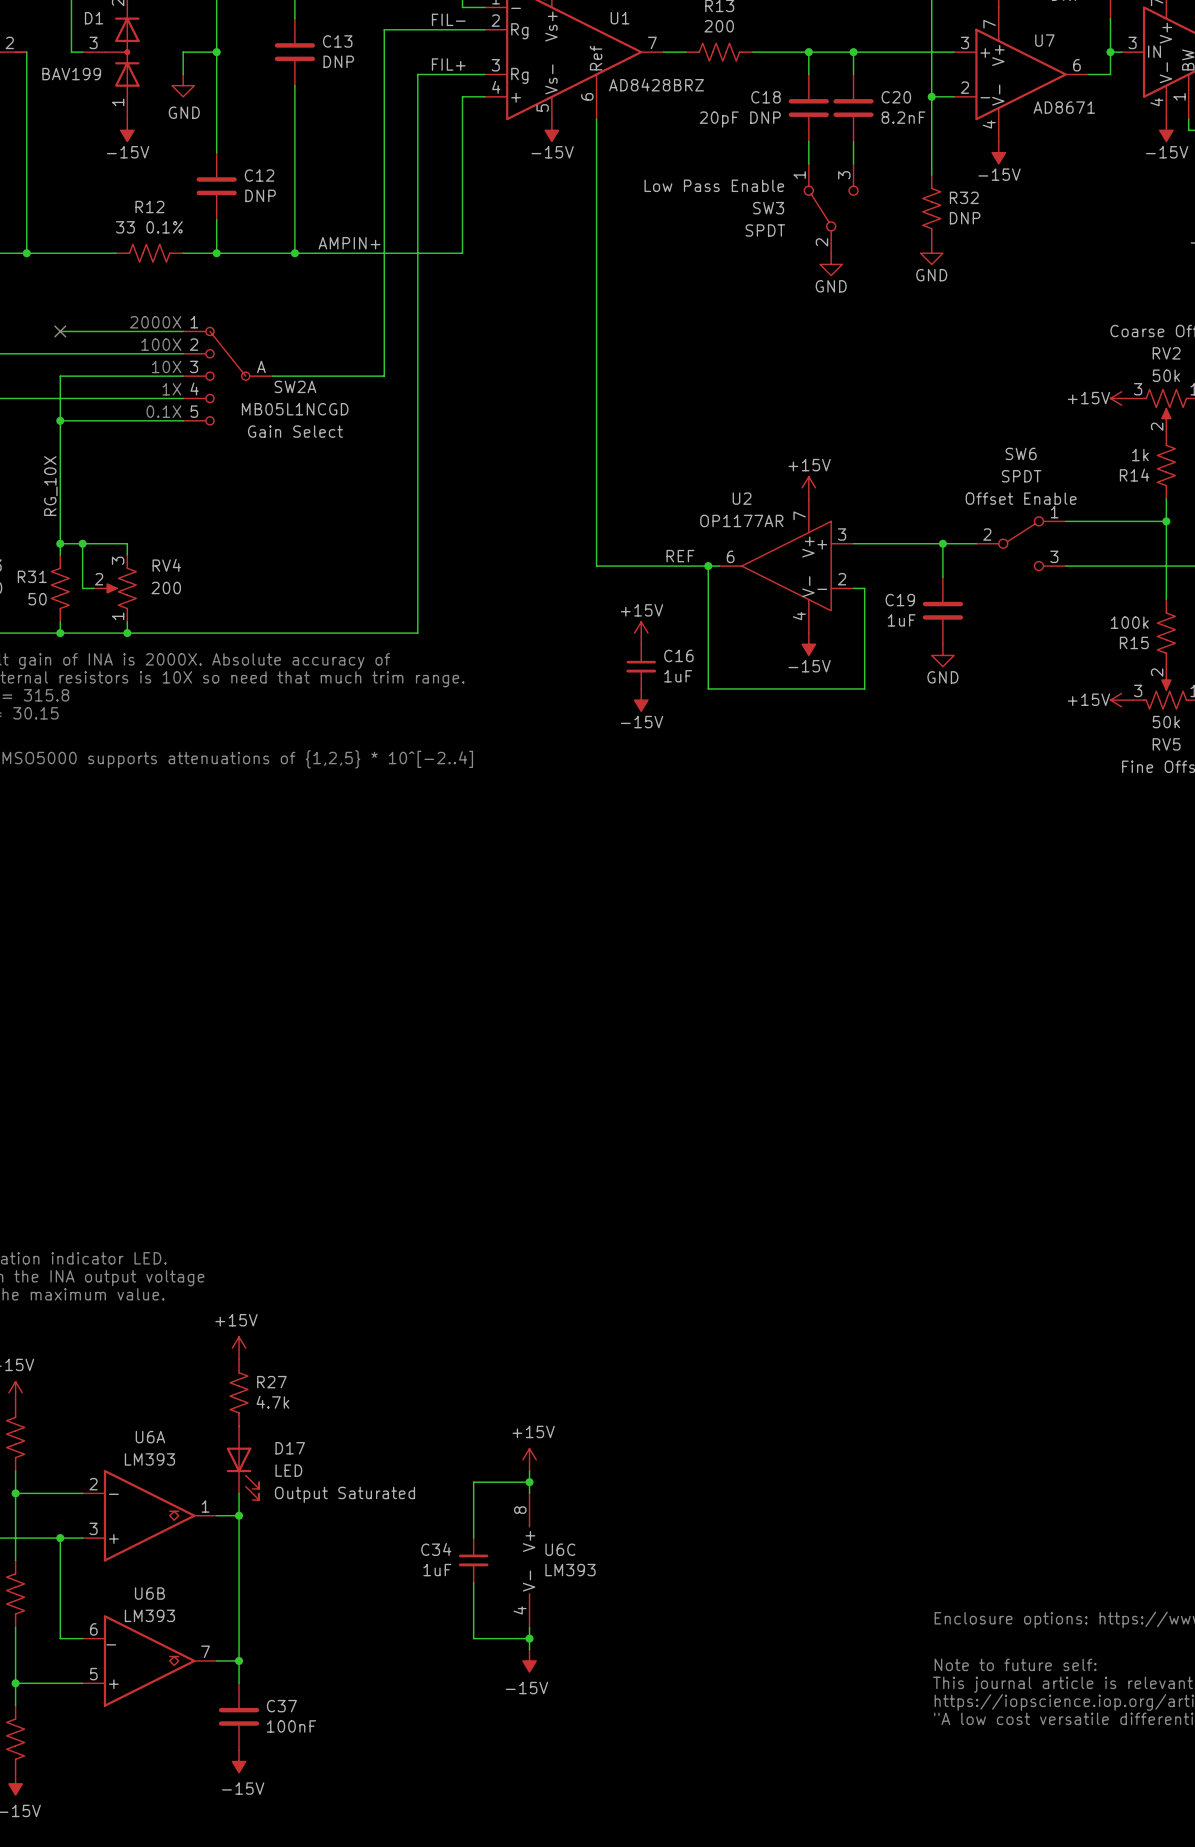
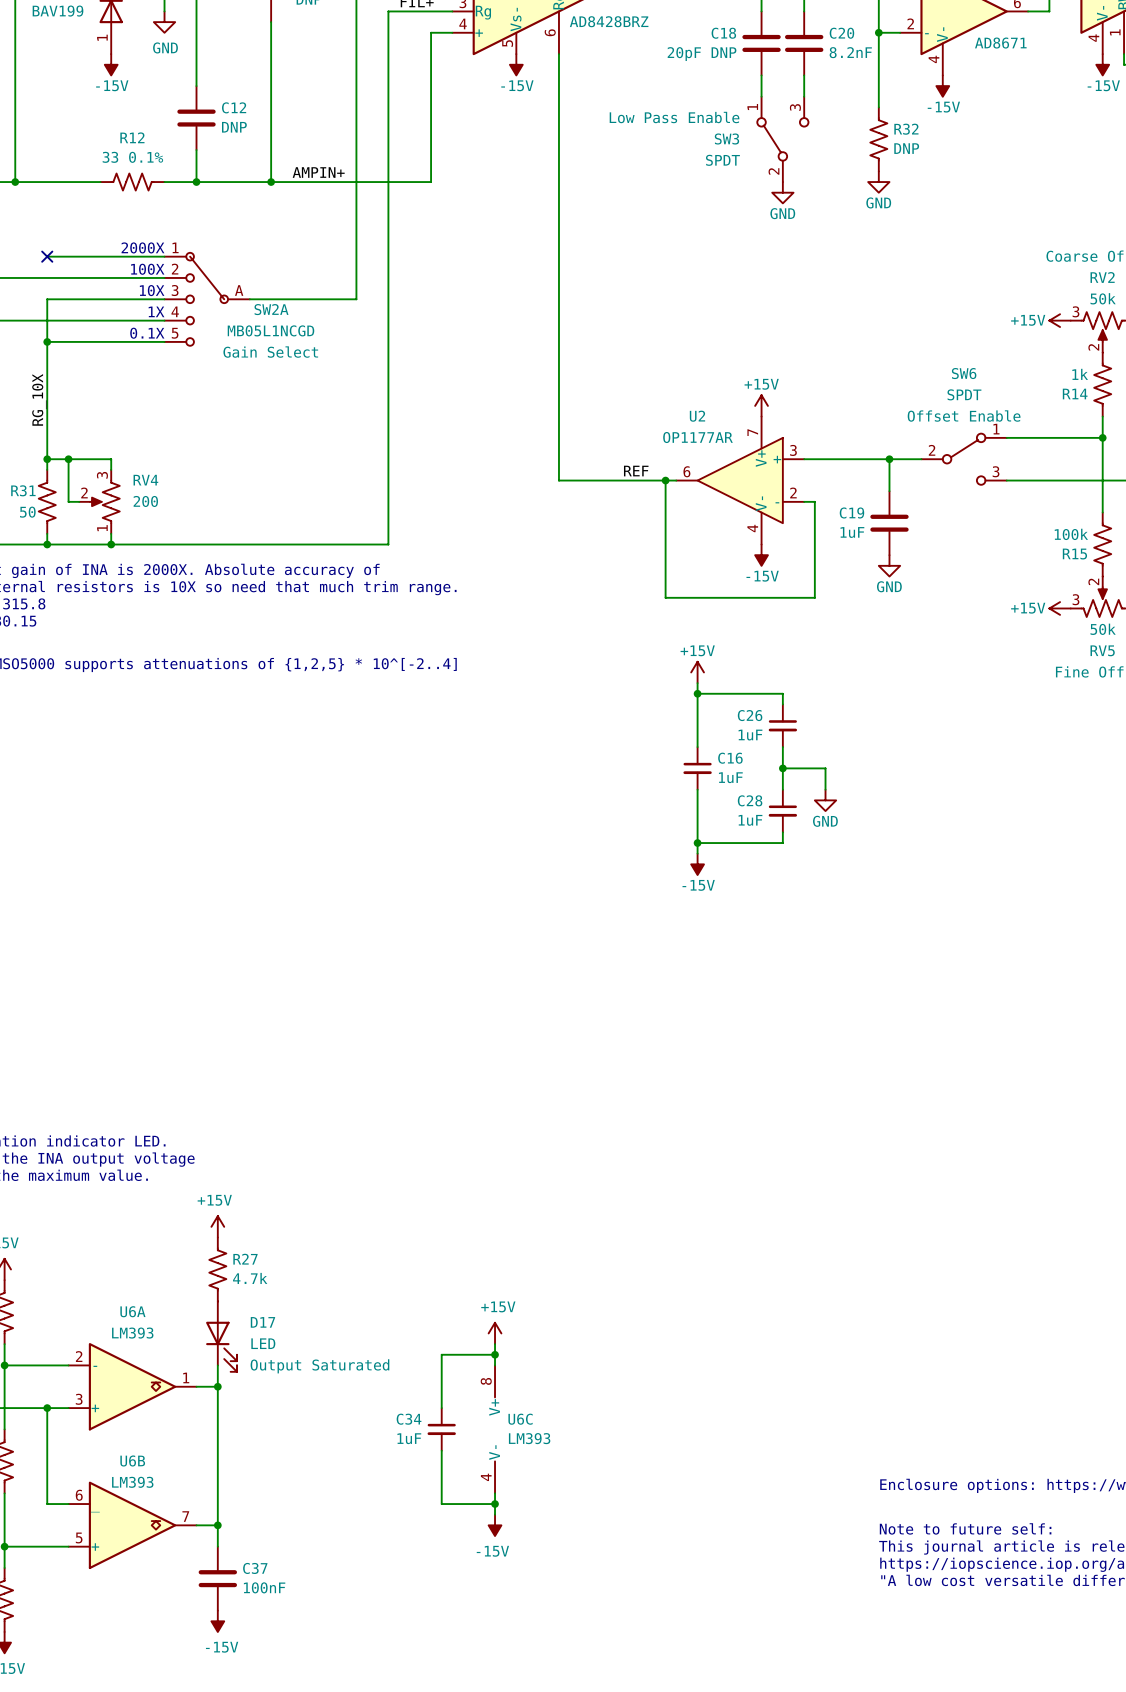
power symbol position: +15V (641, 633) -> +15V (697, 672)
C16 position: (641, 666) -> (697, 768)
power symbol: -15V (641, 700) -> none
wire: none -> (697, 683) (697, 747)
wire: none -> (697, 693) (782, 693) (782, 704)
junction: none -> (697, 693)
C26: none -> 1uF (782, 725)
wire: none -> (782, 747) (782, 789)
wire: none -> (782, 768) (825, 768) (825, 789)
junction: none -> (782, 768)
wire: none -> (697, 789) (697, 853)
power symbol: none -> GND (825, 800)
C28: none -> 1uF (782, 811)
wire: none -> (782, 832) (782, 843) (697, 843)
junction: none -> (697, 843)
power symbol: none -> -15V (697, 864)

